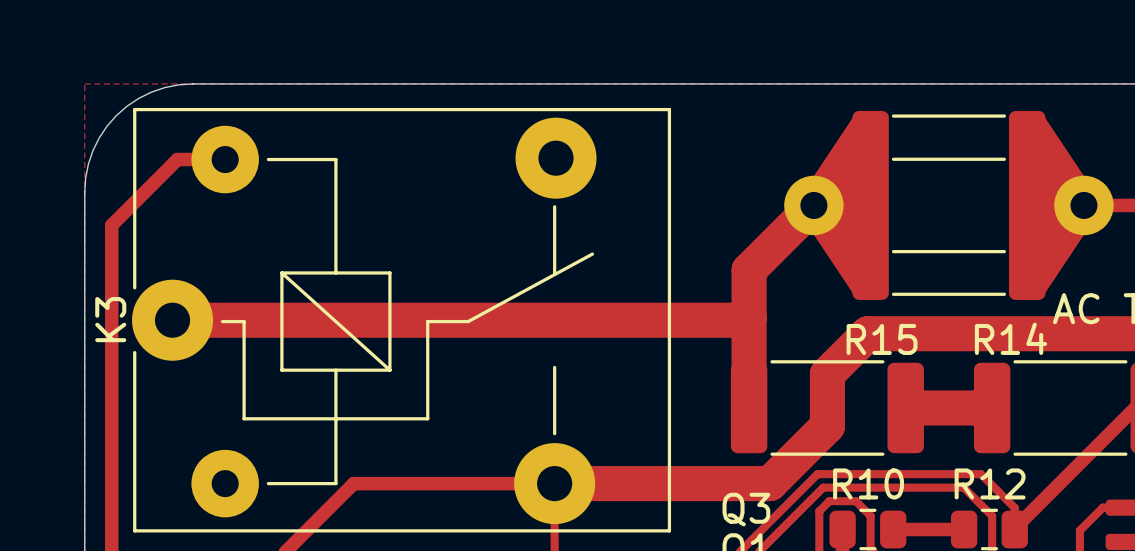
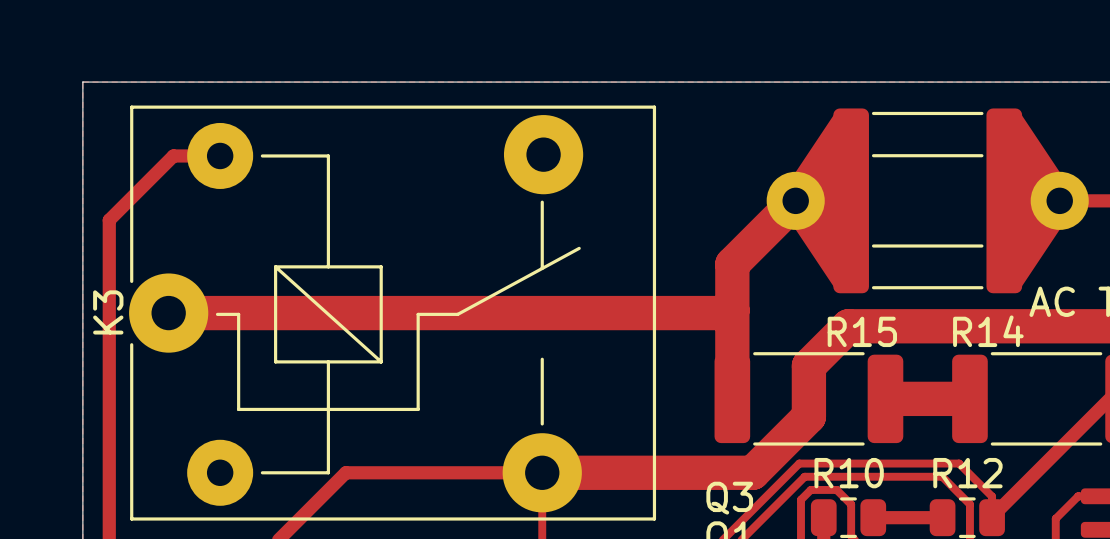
board edge: (192, 83) (164, 87) (151, 92) (138, 98) (116, 115) (99, 137) (92, 150) (88, 163) (84, 191) -> (188, 82) (82, 82) (82, 187)

